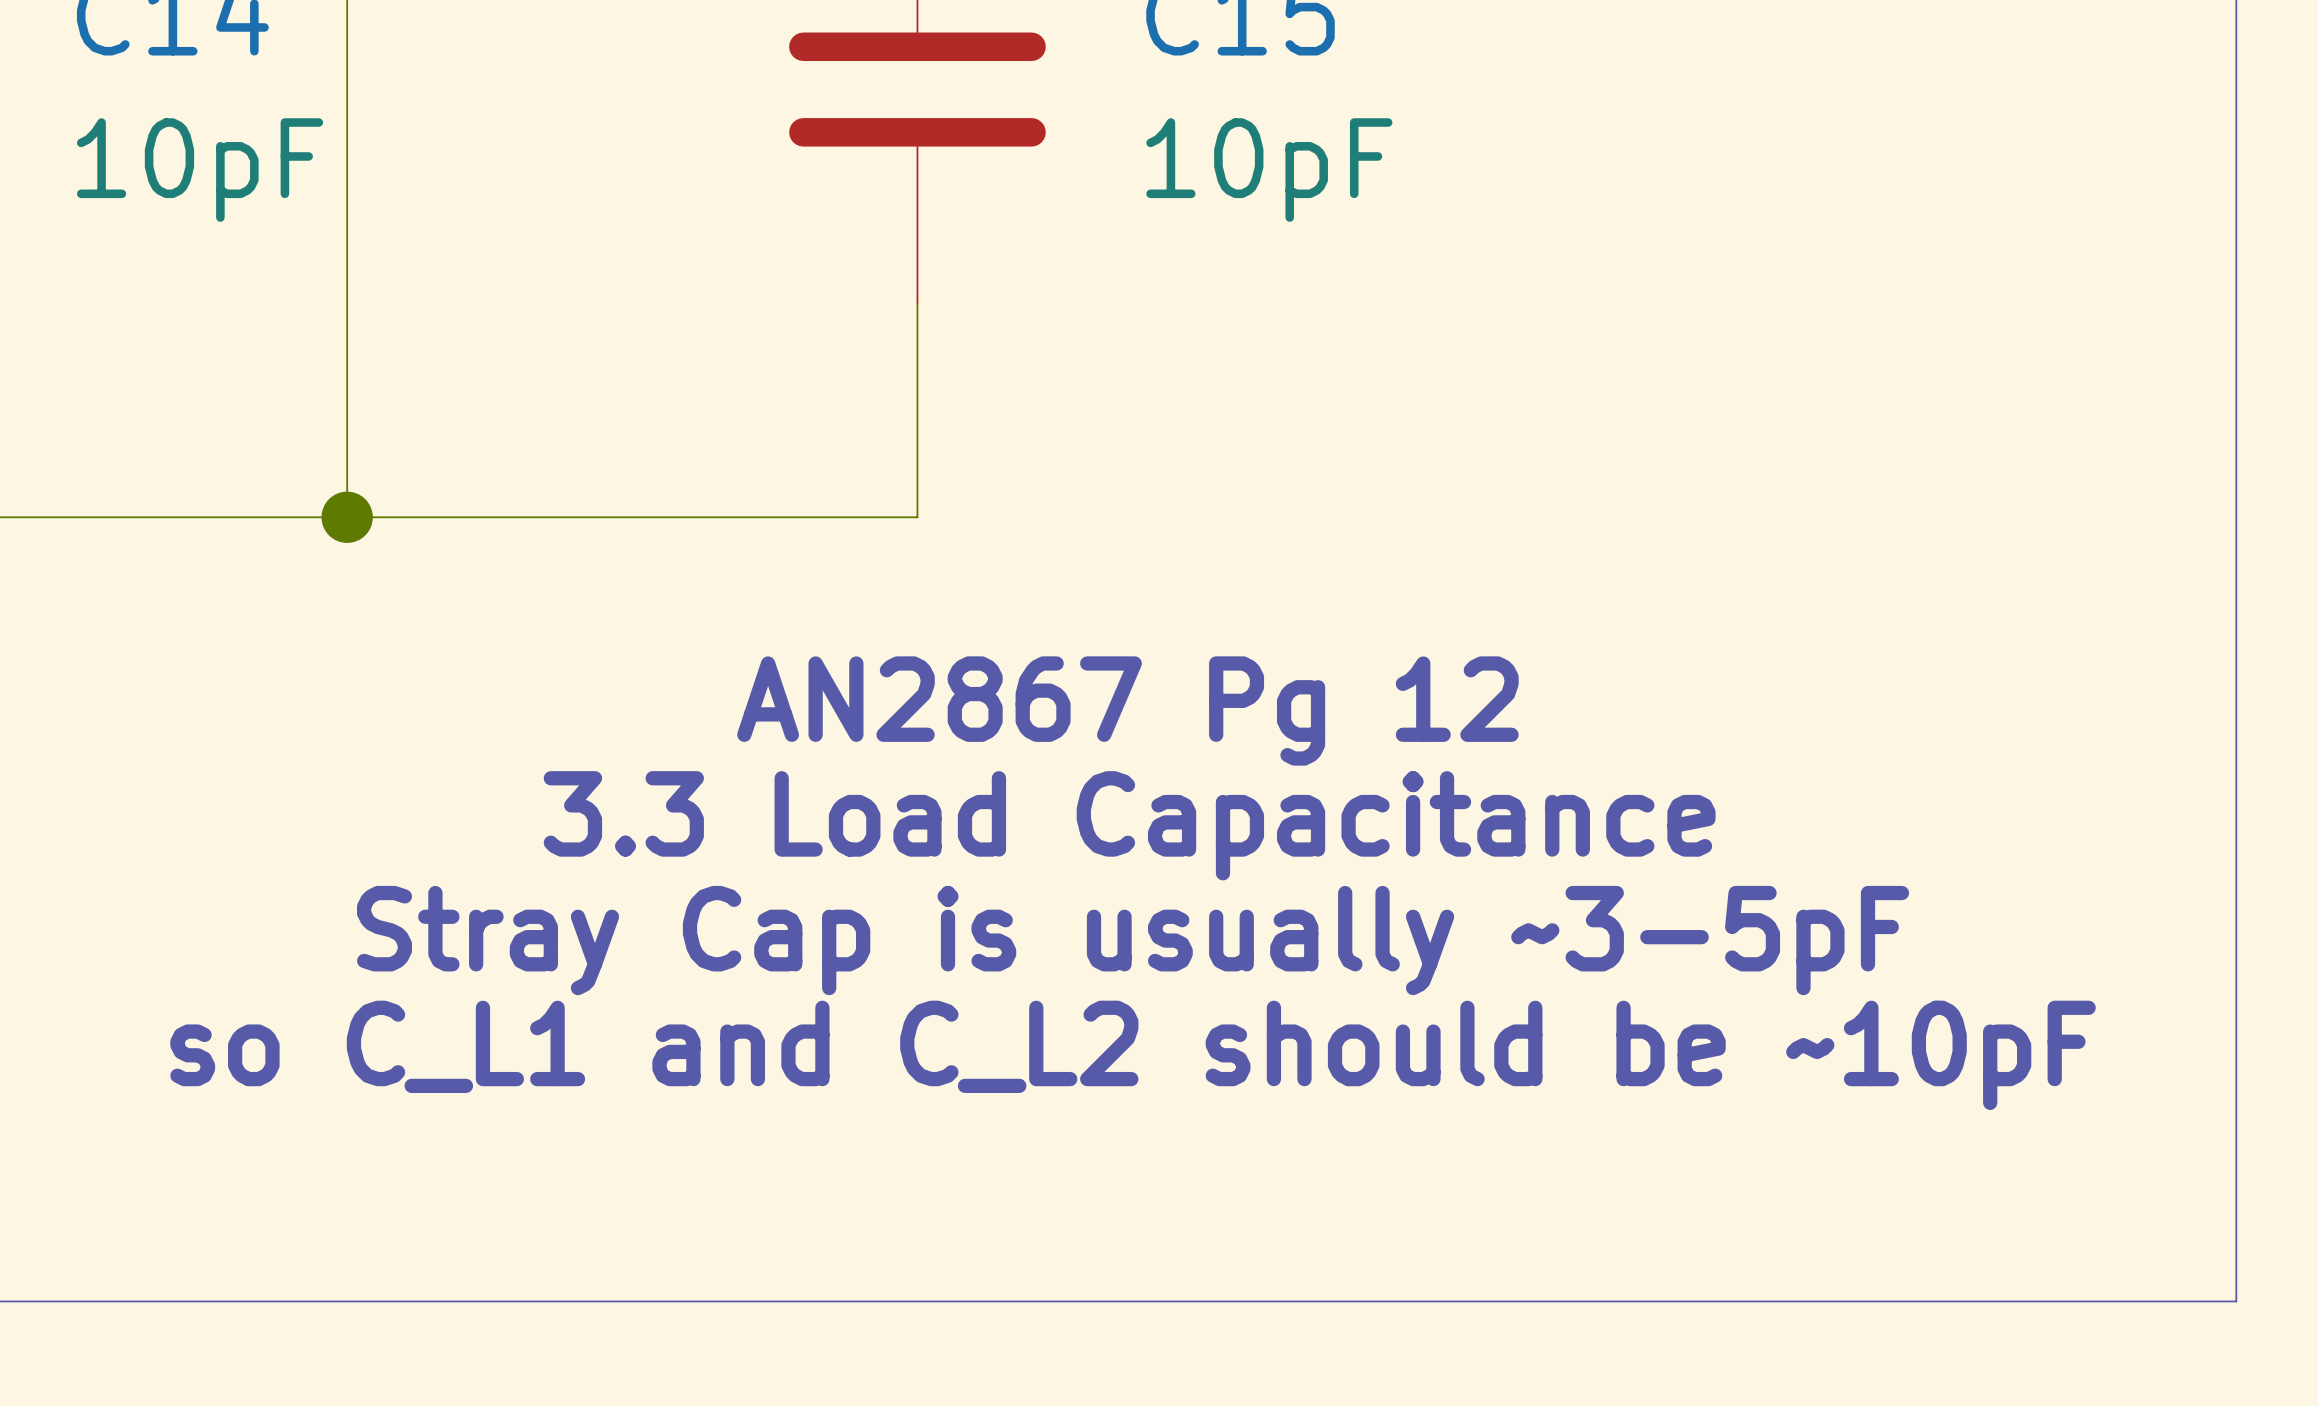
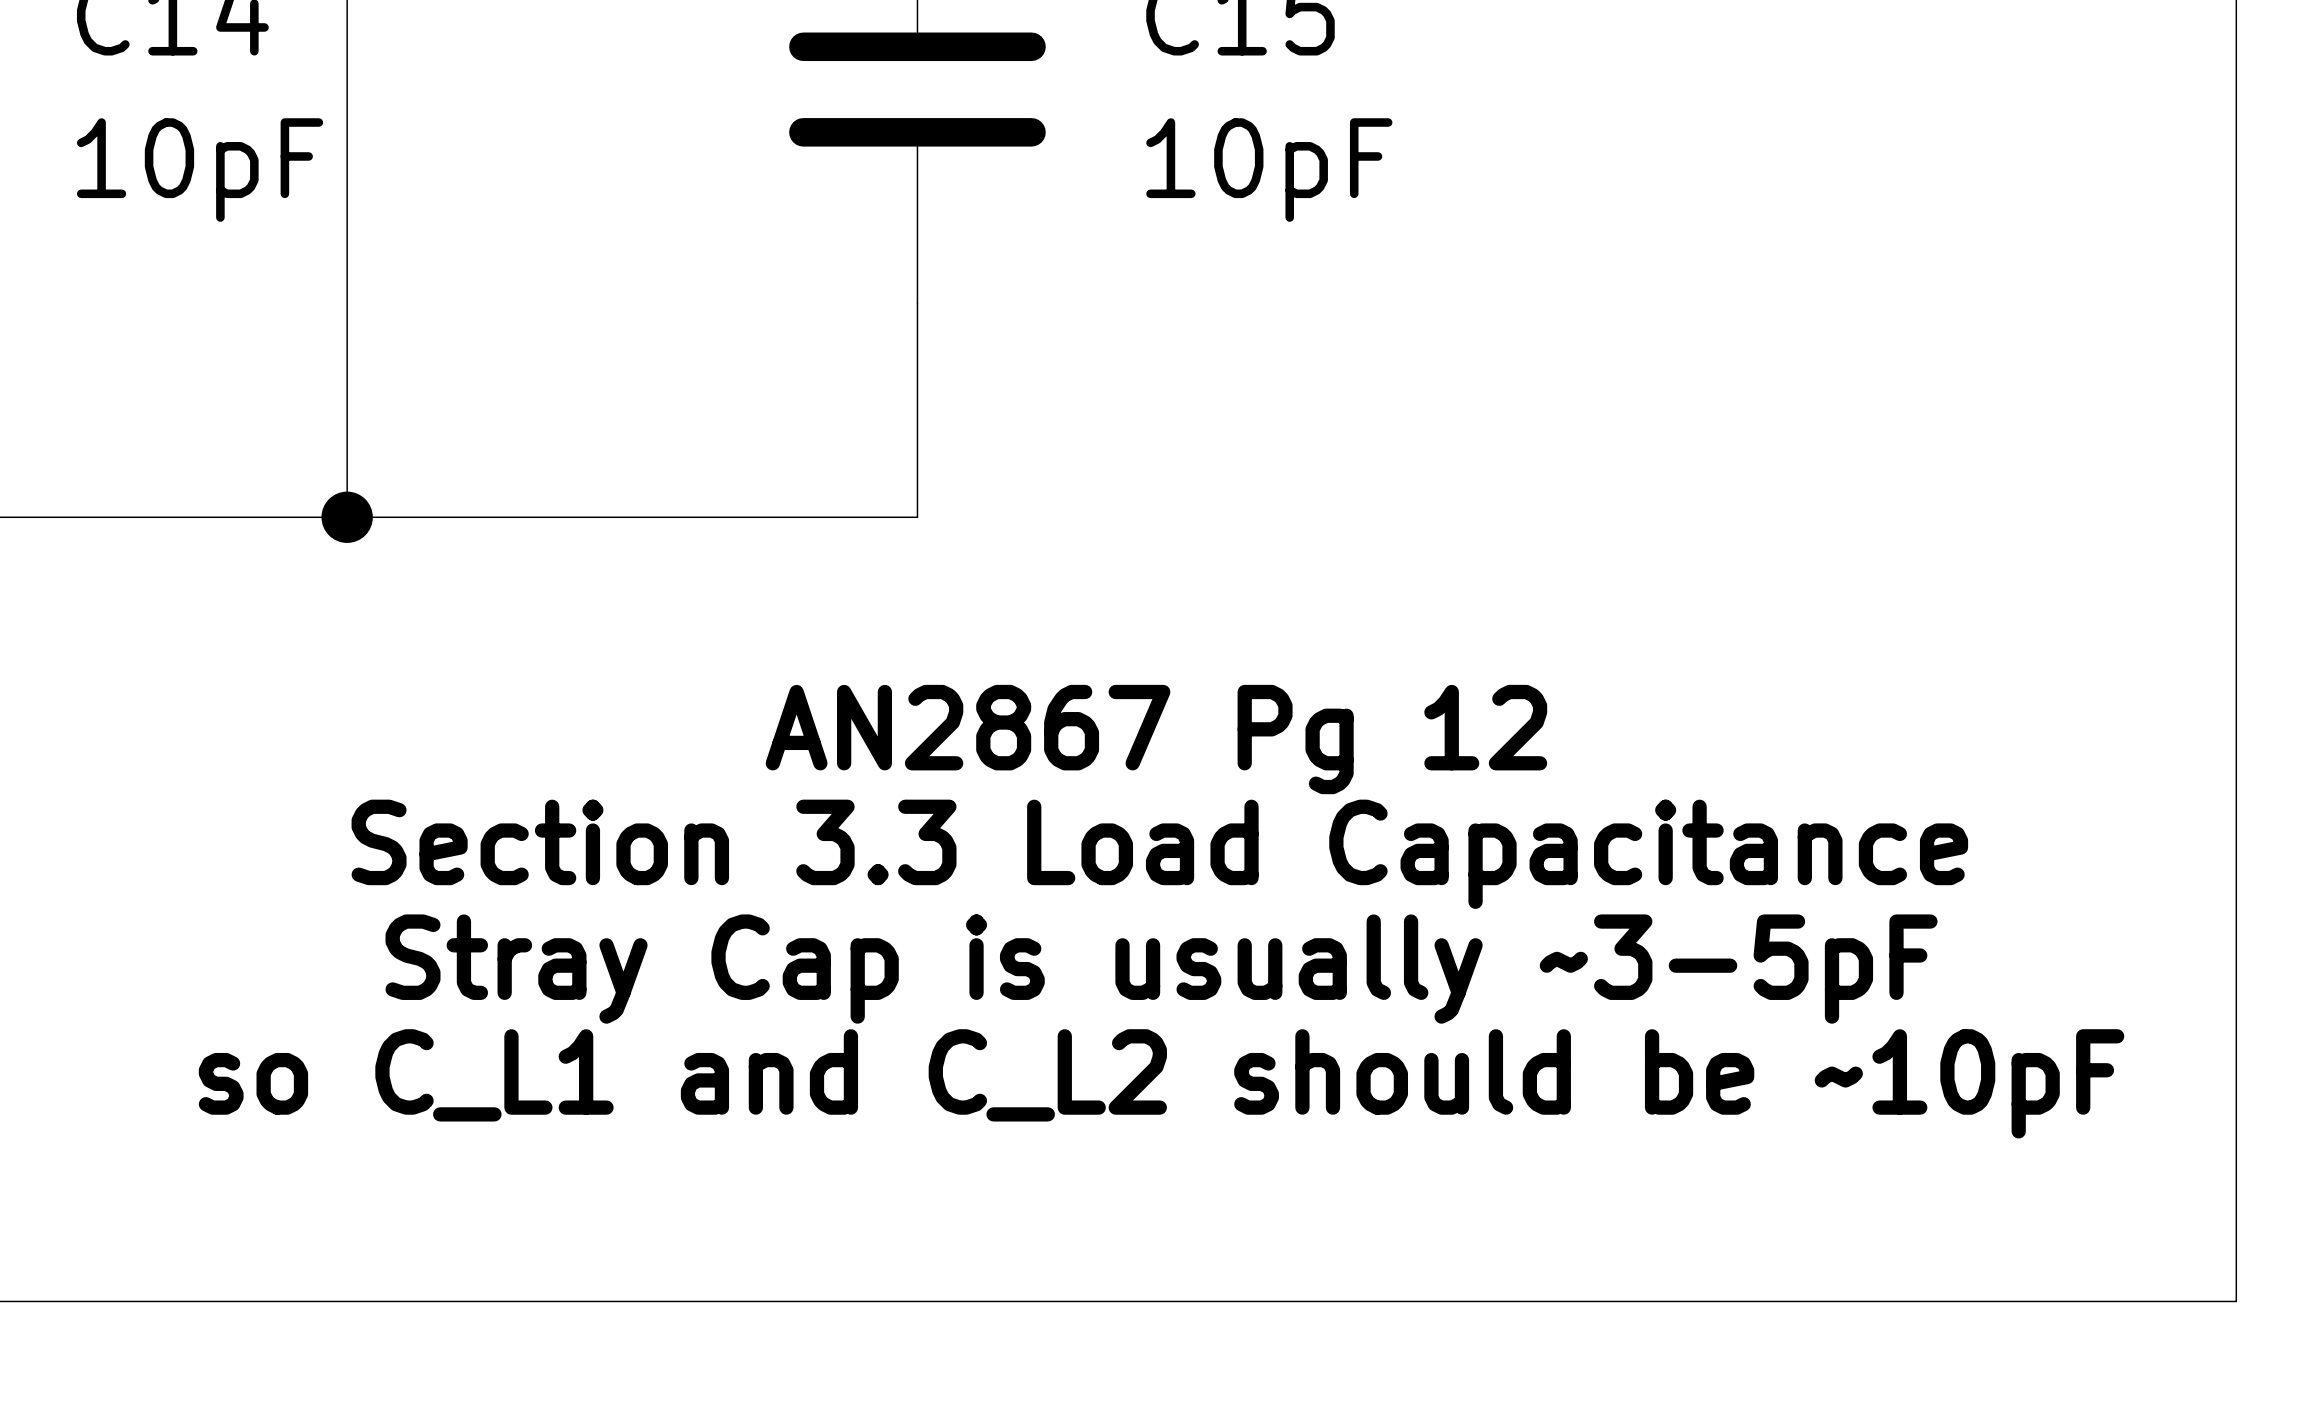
text position: AN2867 Pg 12 (1127, 711) -> AN2867 Pg 12 (1156, 739)
text: 3.3 Load Capacitance (1129, 825) -> Section 3.3 Load Capacitance (1159, 854)
text position: Stray Cap is usually ~3-5pF (1133, 940) -> Stray Cap is usually ~3-5pF (1161, 969)
text position: so C_L1 and C_L2 should be ~10pF (1133, 1055) -> so C_L1 and C_L2 should be ~10pF (1161, 1083)

